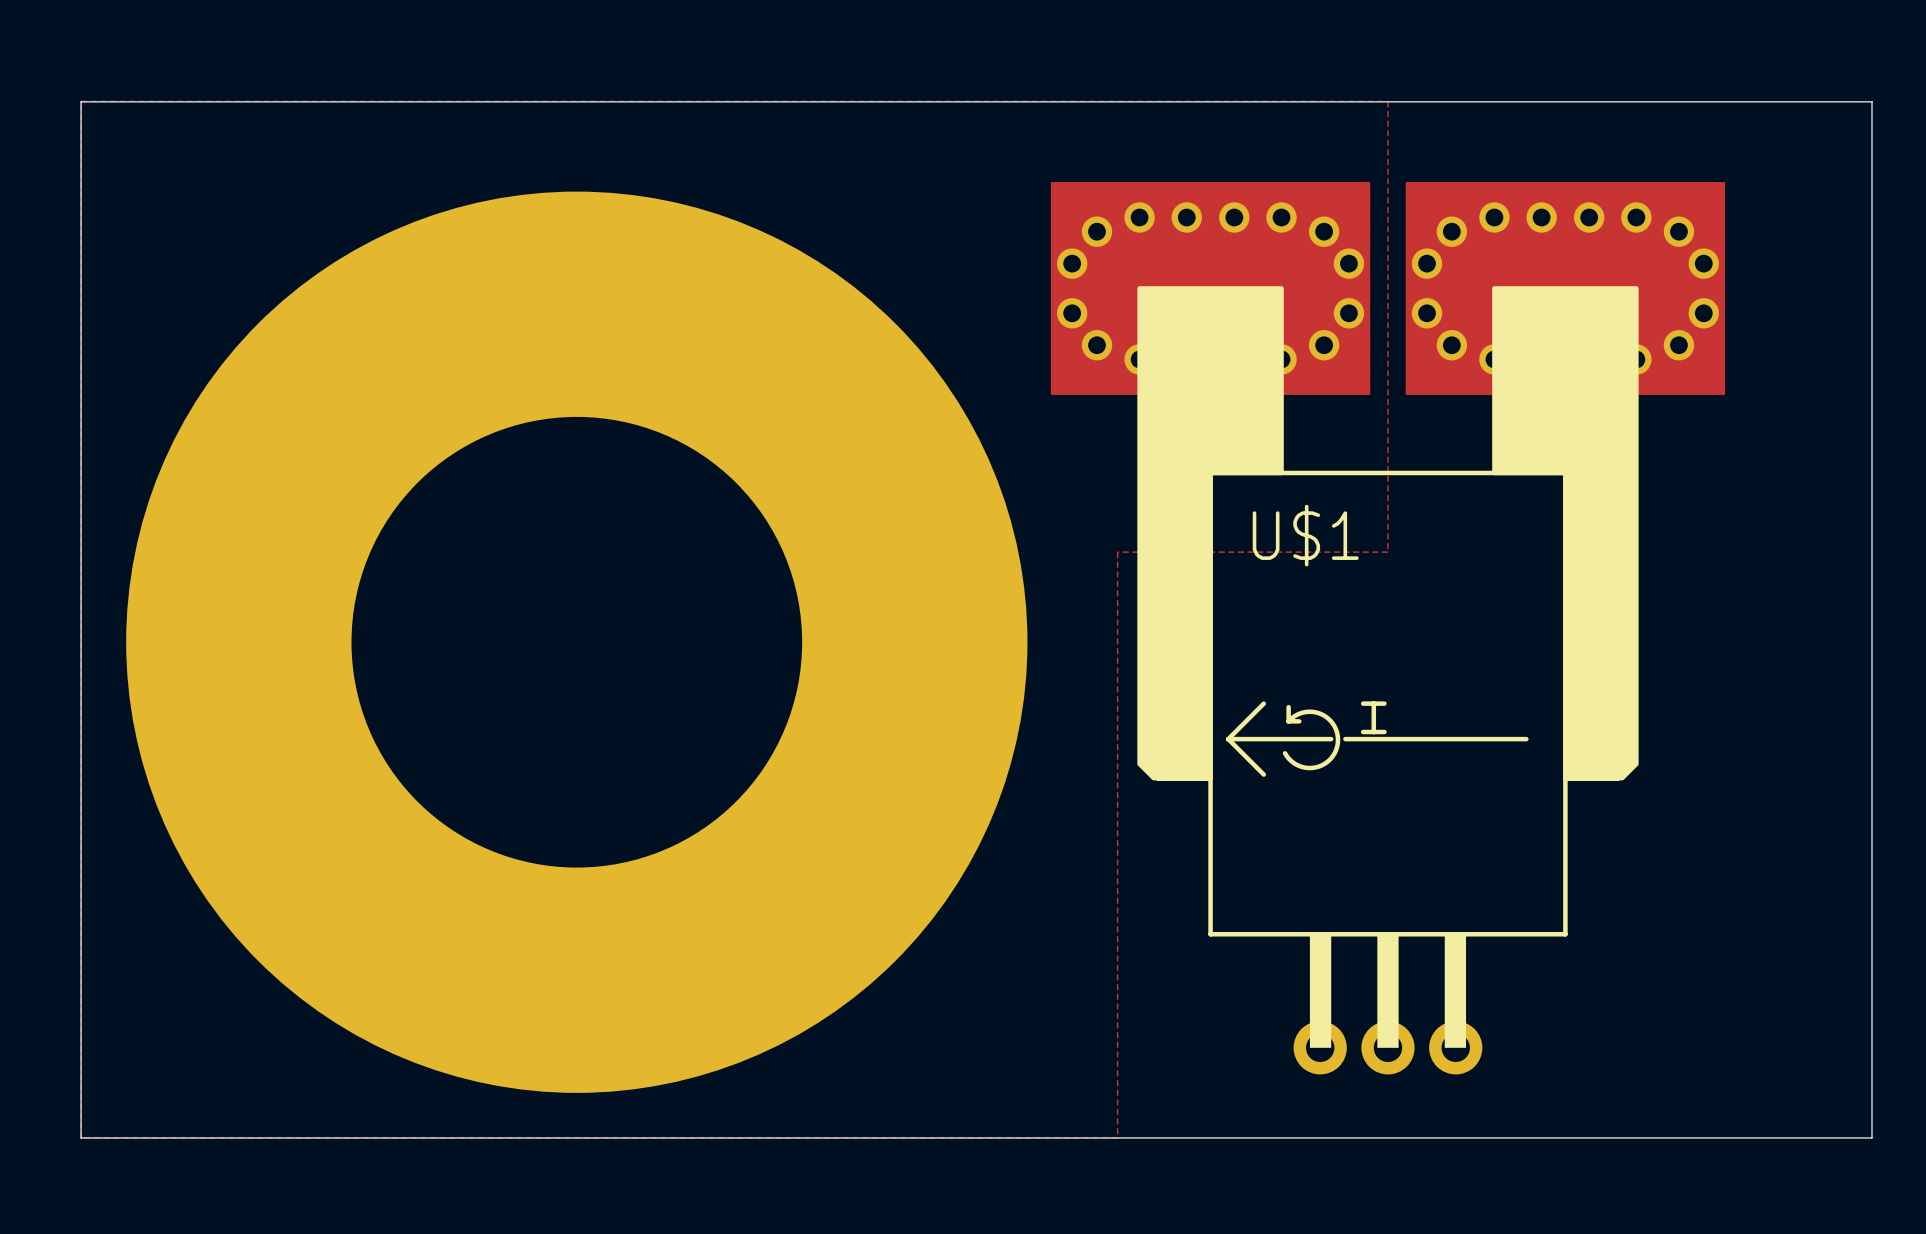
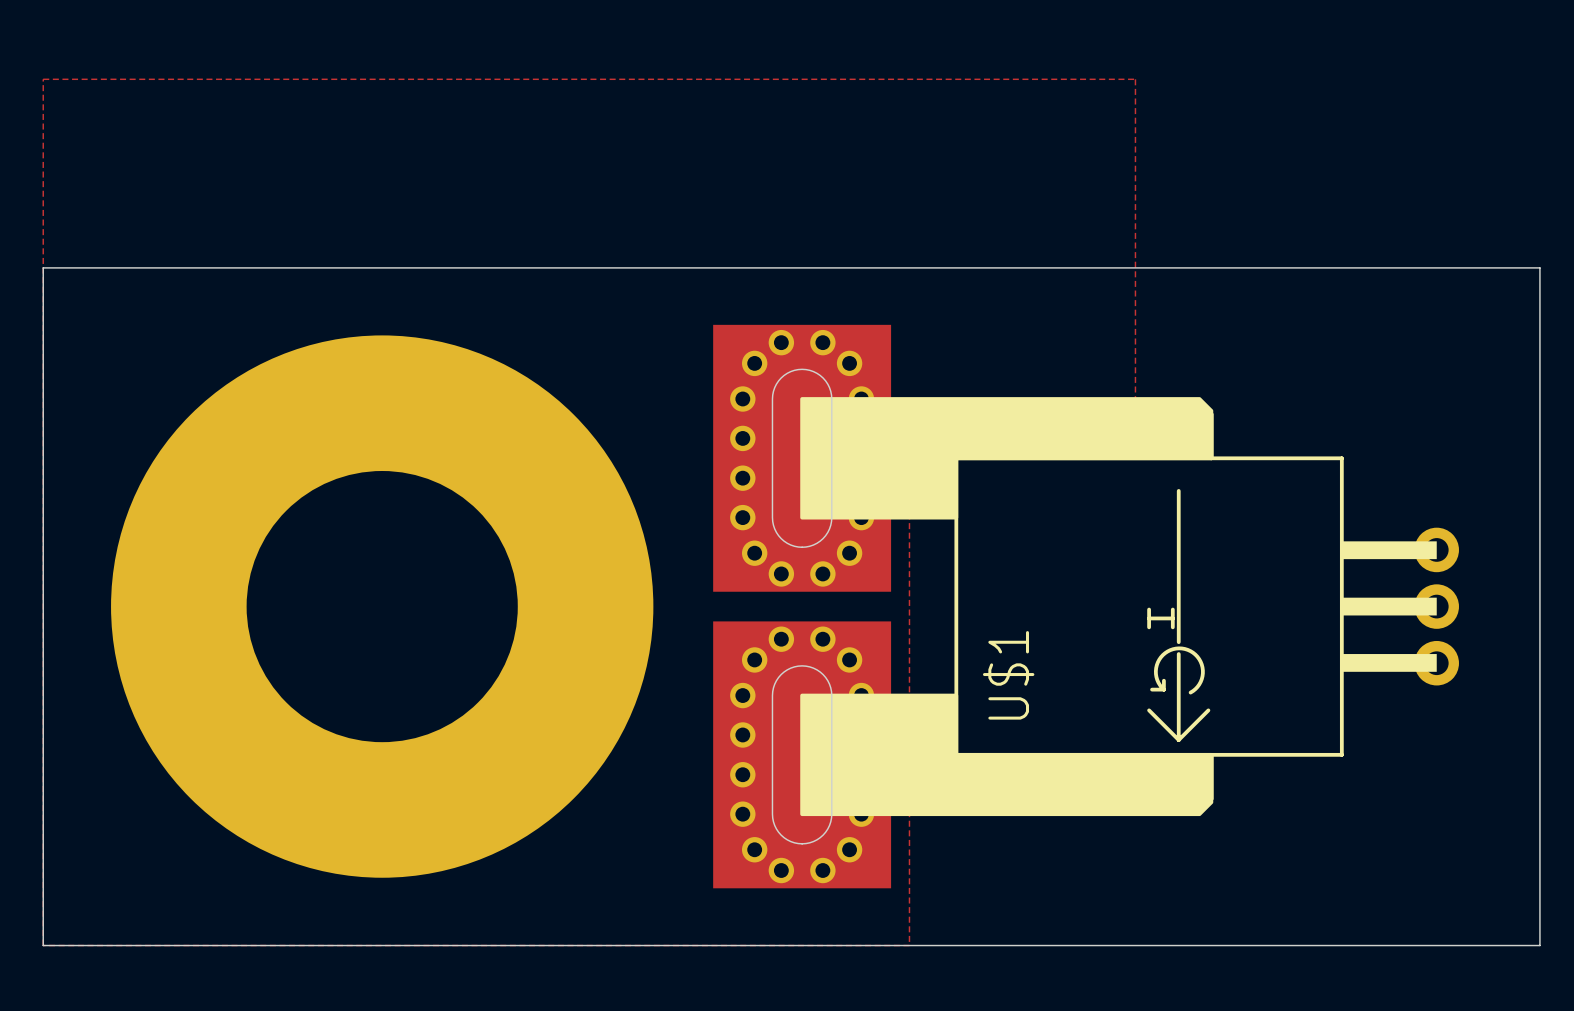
U$1 footprint: [1050, 182, 1726, 1075] -> [713, 324, 1459, 889]
board edge: (81, 327) (81, 101) (1871, 101) (1871, 327) -> (43, 267) (1539, 267)
U$1 name position: U$1 (1305, 535) -> U$1 (1008, 675)
part: (576, 642) -> none
part: none -> (382, 606)

